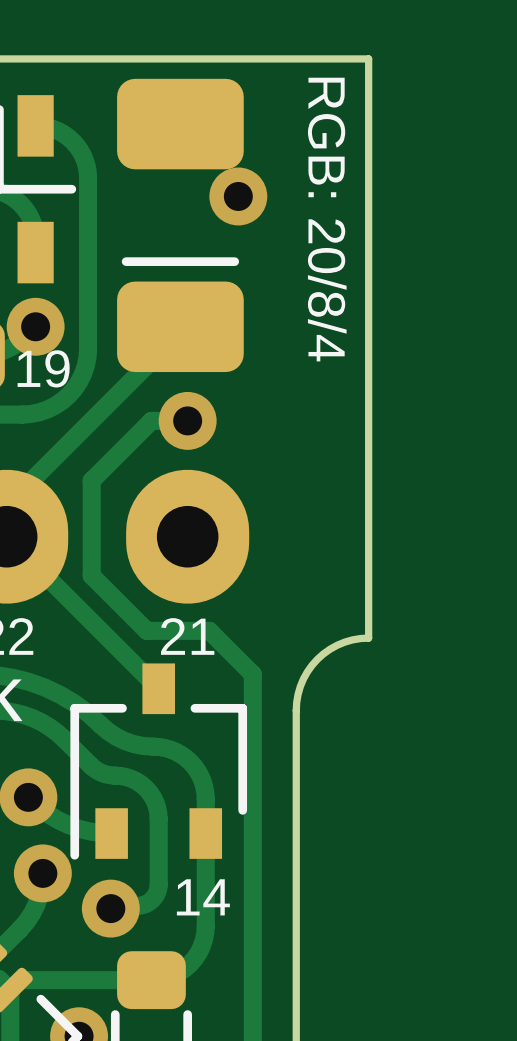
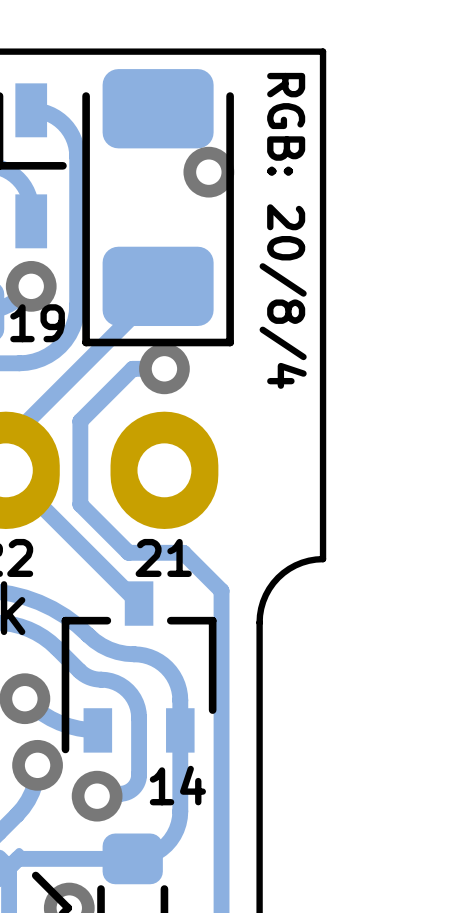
part footprint: [117, 78, 244, 373] -> [82, 69, 234, 347]

